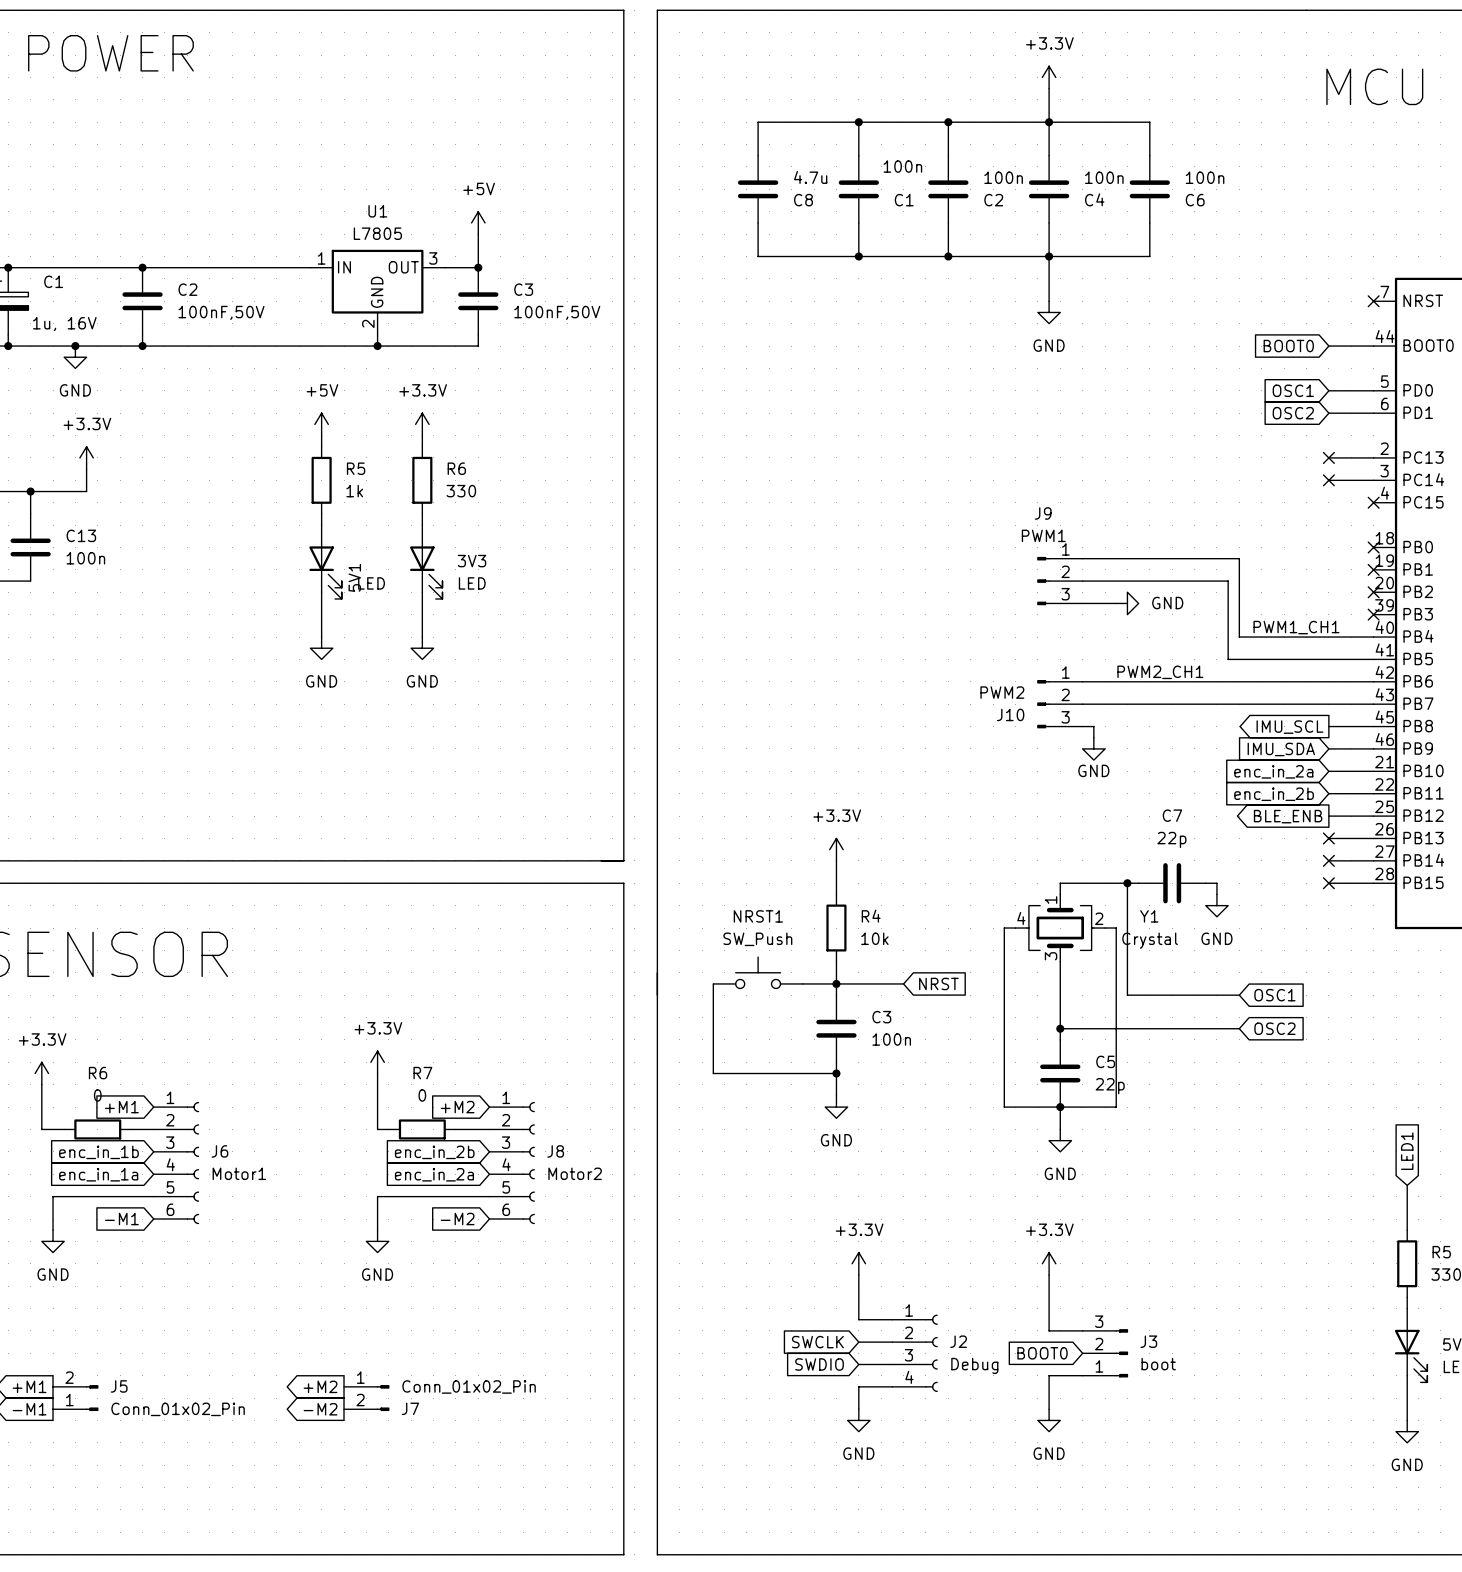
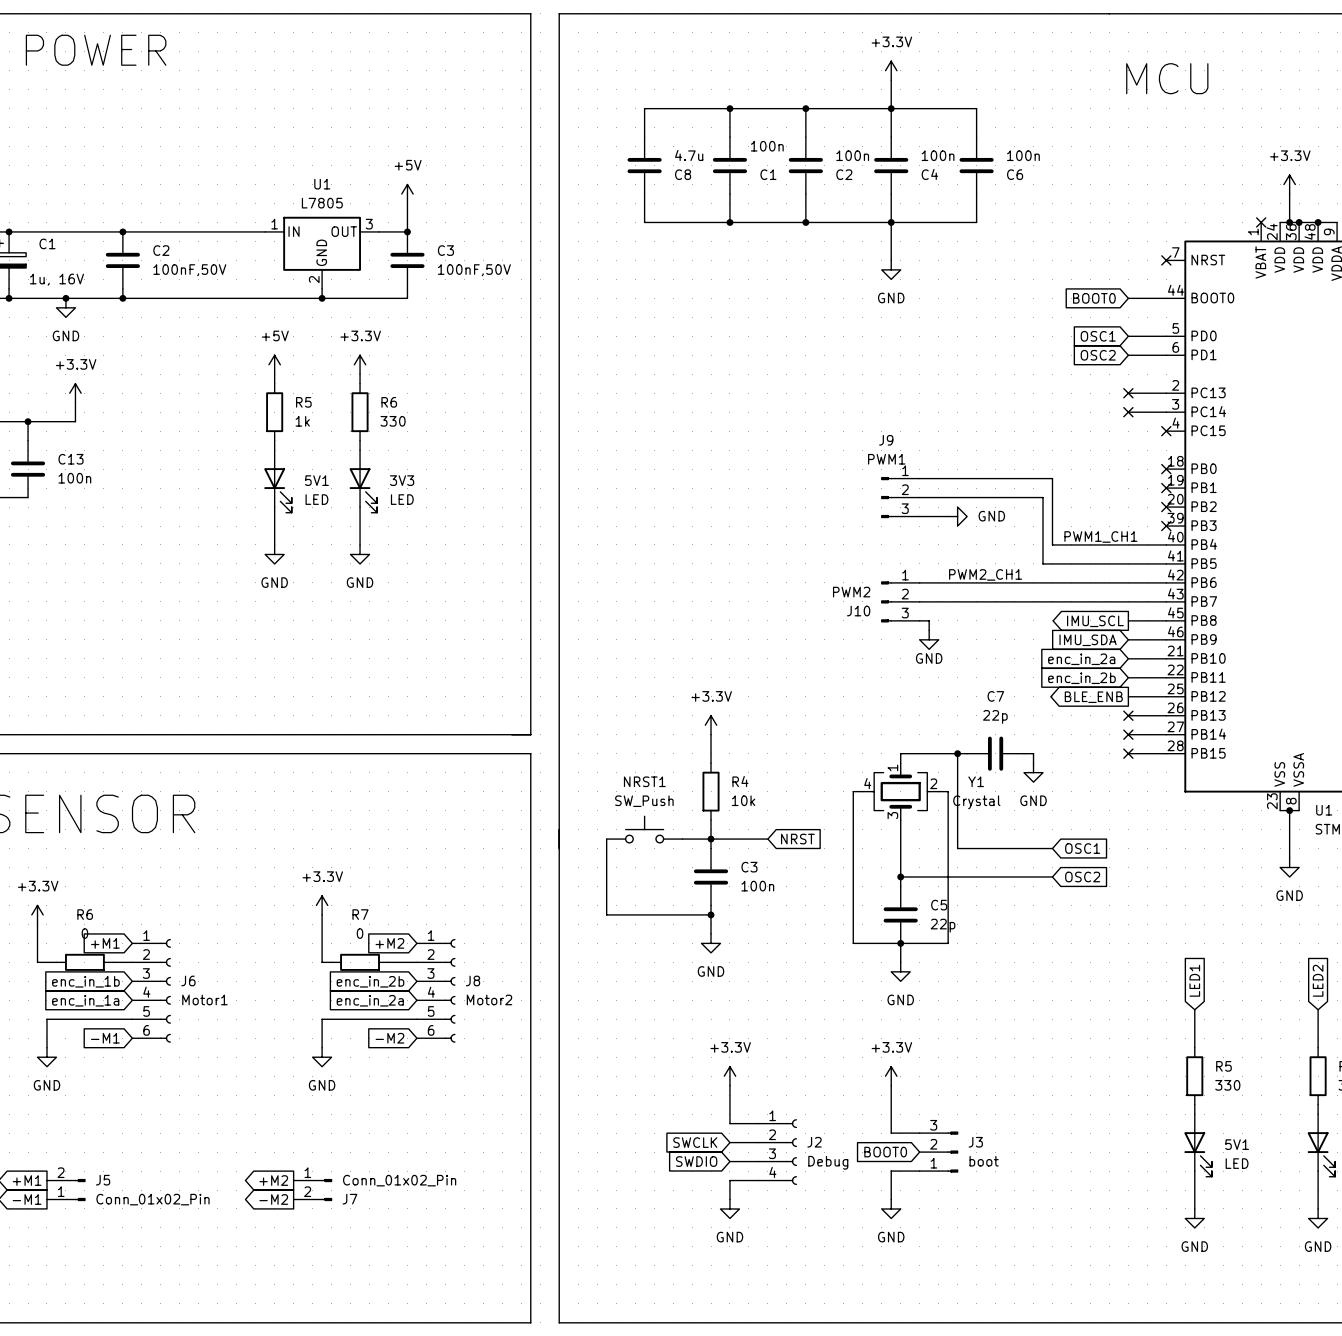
5V1 name rotation: 0° (354, 577) -> 90° clockwise (316, 480)

